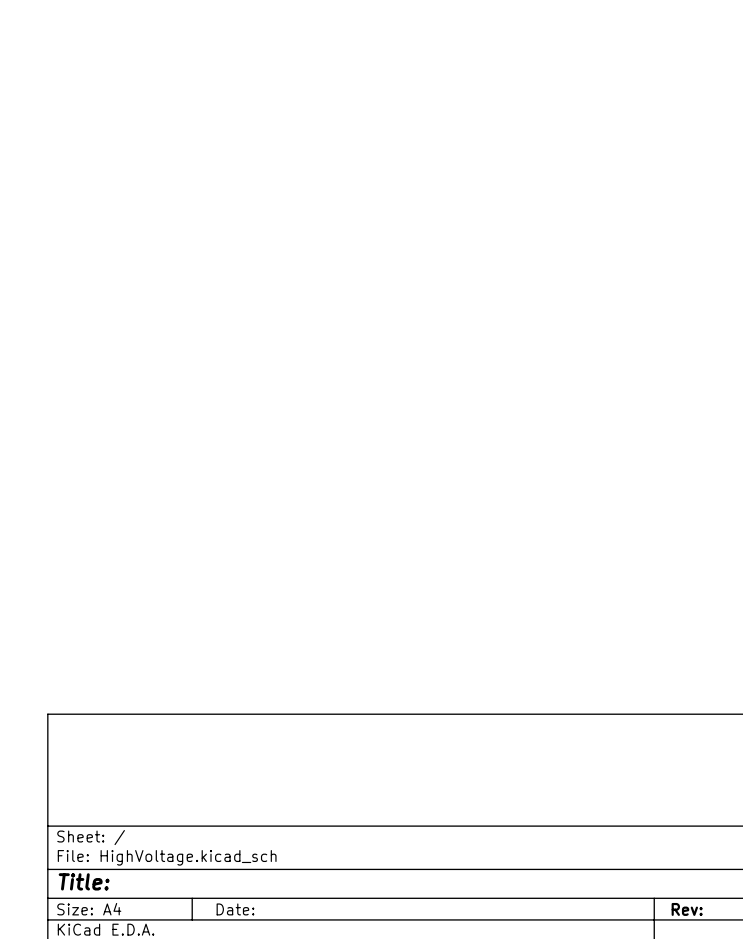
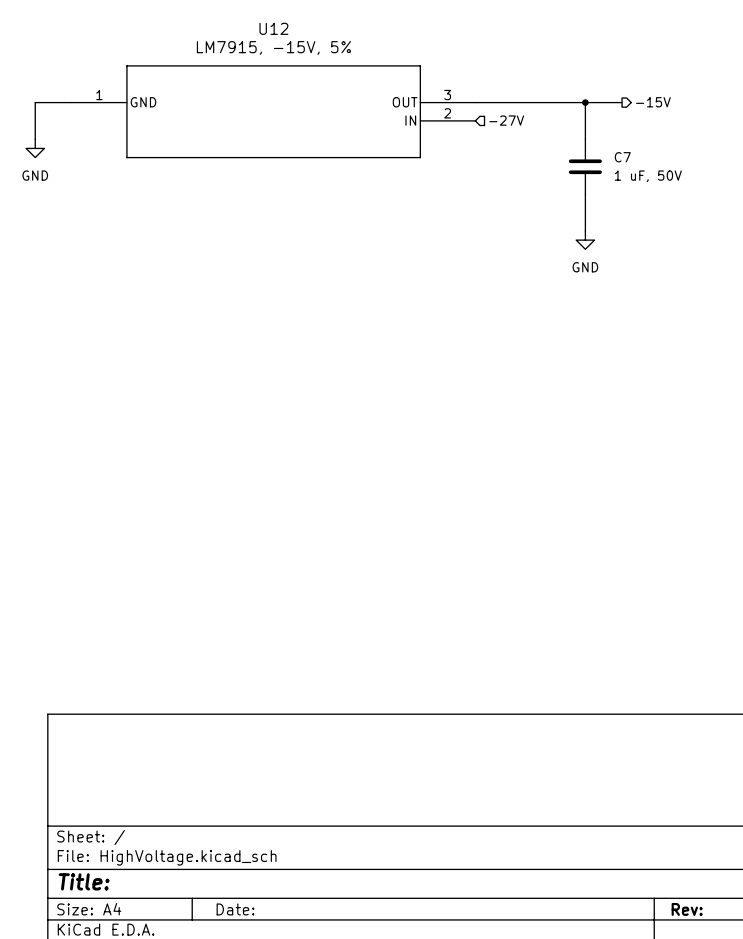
wire: none -> (71, 102) (35, 102) (35, 139)
wire: none -> (475, 102) (622, 102)
wire: none -> (585, 102) (585, 139)
junction: none -> (585, 102)
hierarchical label: none -> -15V (653, 102)
U12: none -> LM7915, -15V, 5% (273, 111)
hierarchical label: none -> -27V (506, 120)
power symbol: none -> GND (35, 148)
C7: none -> 1 uF, 50V (585, 166)
wire: none -> (585, 194) (585, 230)
power symbol: none -> GND (585, 240)

